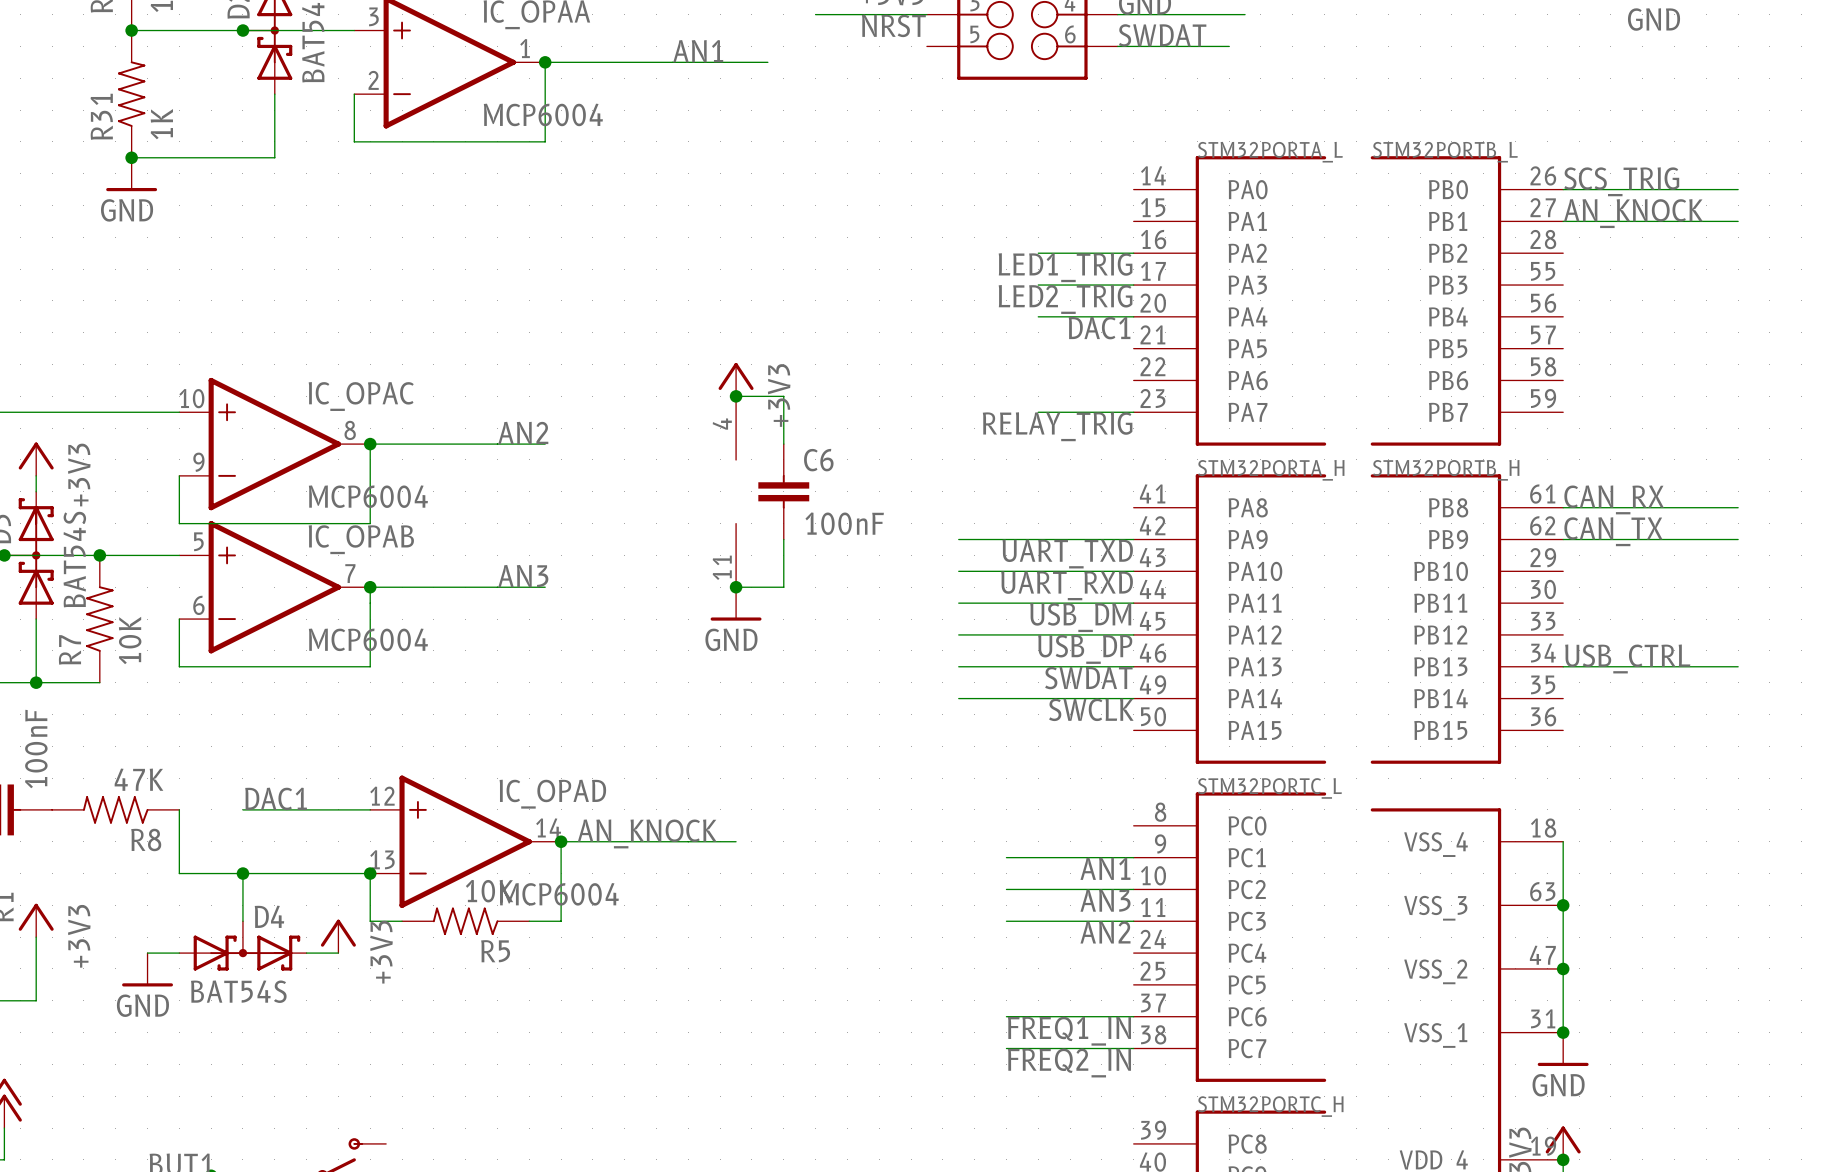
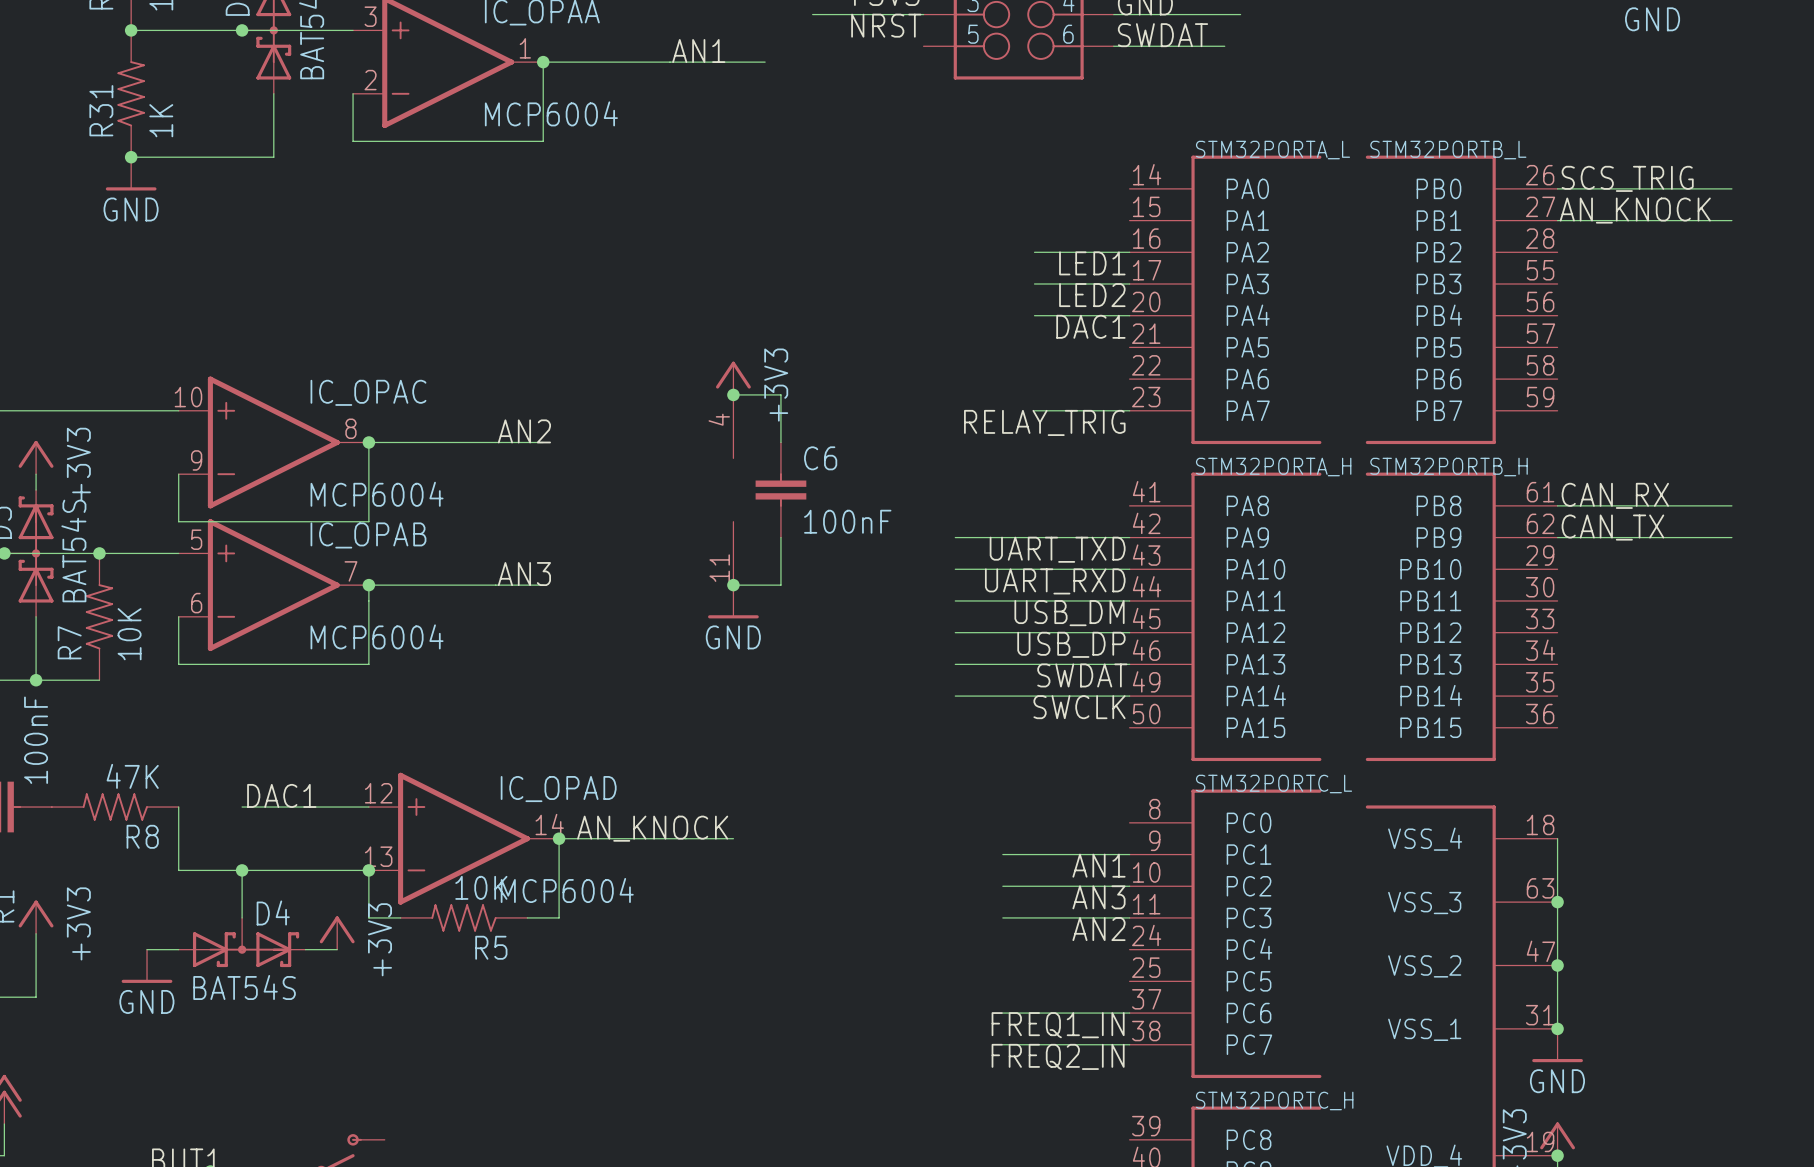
label: LED1_TRIG (1065, 267) -> LED1 (1092, 263)
label: LED2_TRIG (1065, 299) -> LED2 (1092, 295)
label: USB_CTRL (1627, 658) -> none
wire: (1563, 666) (1738, 666) -> none

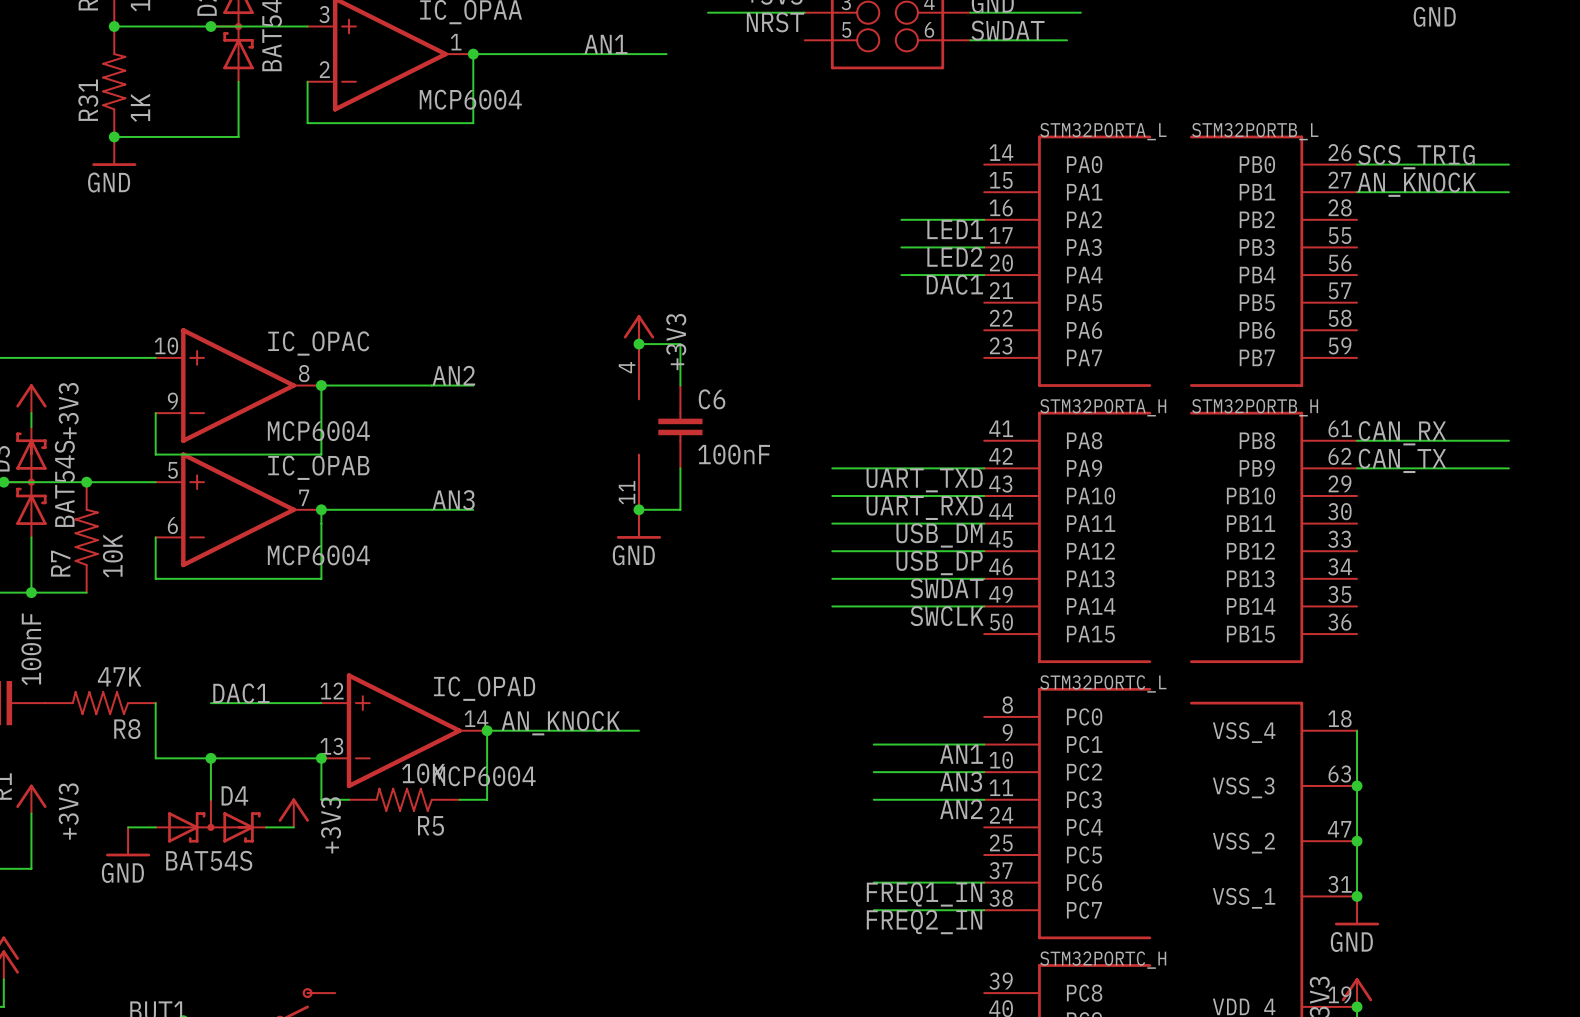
wire: (1034, 410) (1129, 410) -> none
label: RELAY_TRIG (1044, 422) -> none

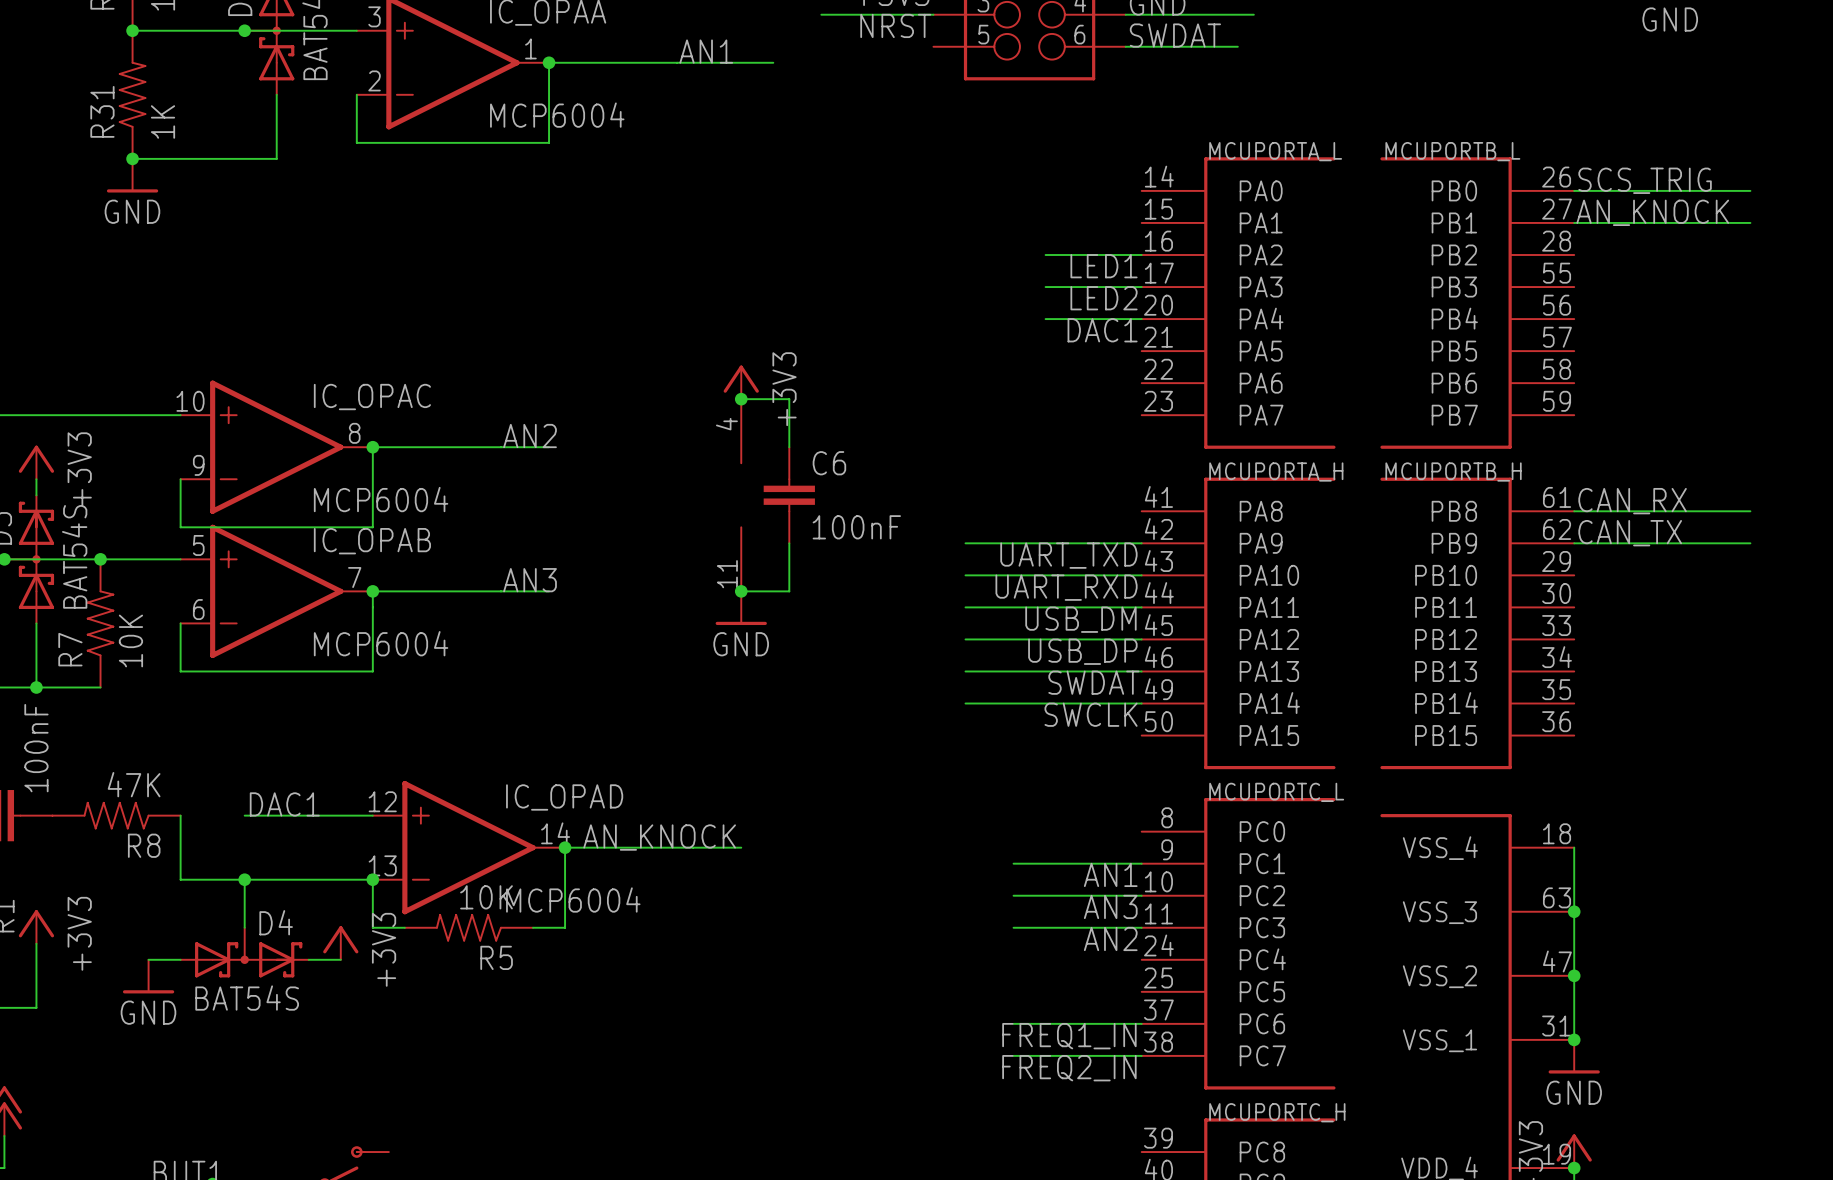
STM32PORTA_L name: STM32PORTA_L (1103, 131) -> MCUPORTA_L (1275, 151)
STM32PORTB_L name: STM32PORTB_L (1255, 131) -> MCUPORTB_L (1452, 151)
STM32PORTA_H name: STM32PORTA_H (1103, 407) -> MCUPORTA_H (1276, 472)
STM32PORTB_H name: STM32PORTB_H (1255, 407) -> MCUPORTB_H (1453, 472)
STM32PORTC_L name: STM32PORTC_L (1103, 683) -> MCUPORTC_L (1276, 792)
STM32PORTC_H name: STM32PORTC_H (1103, 960) -> MCUPORTC_H (1277, 1112)

